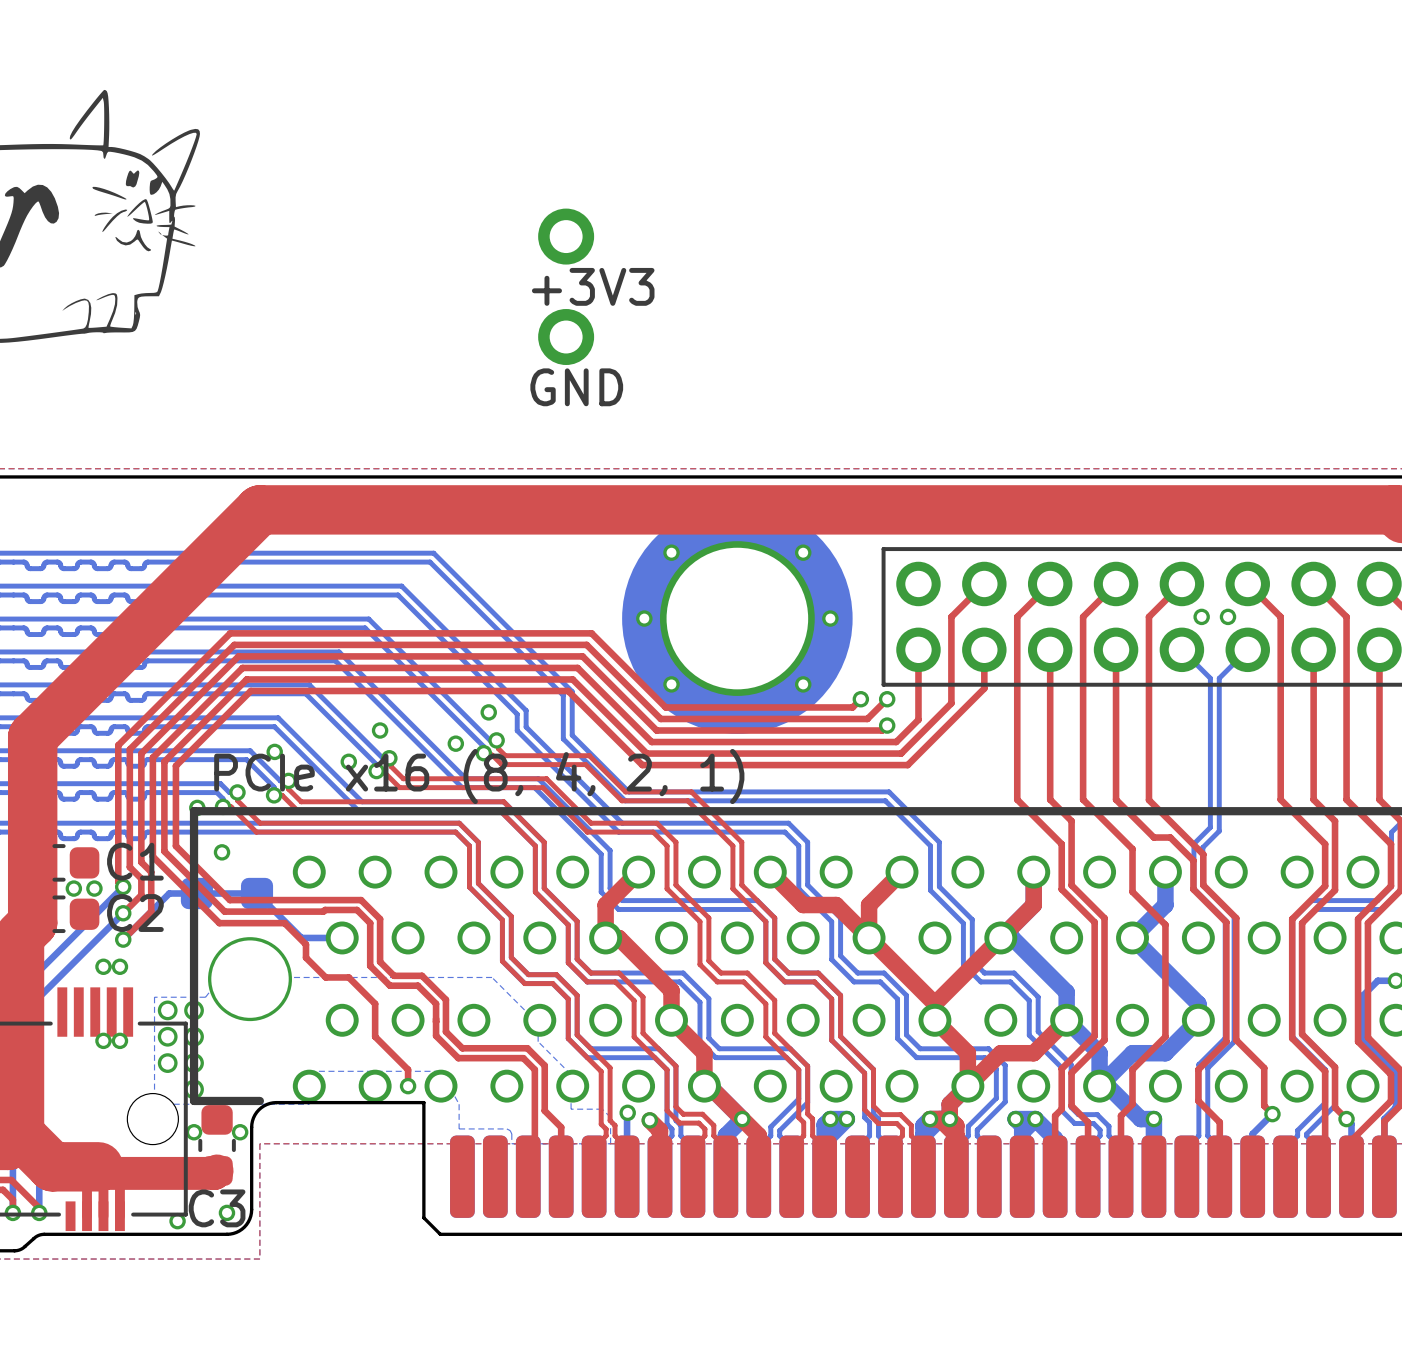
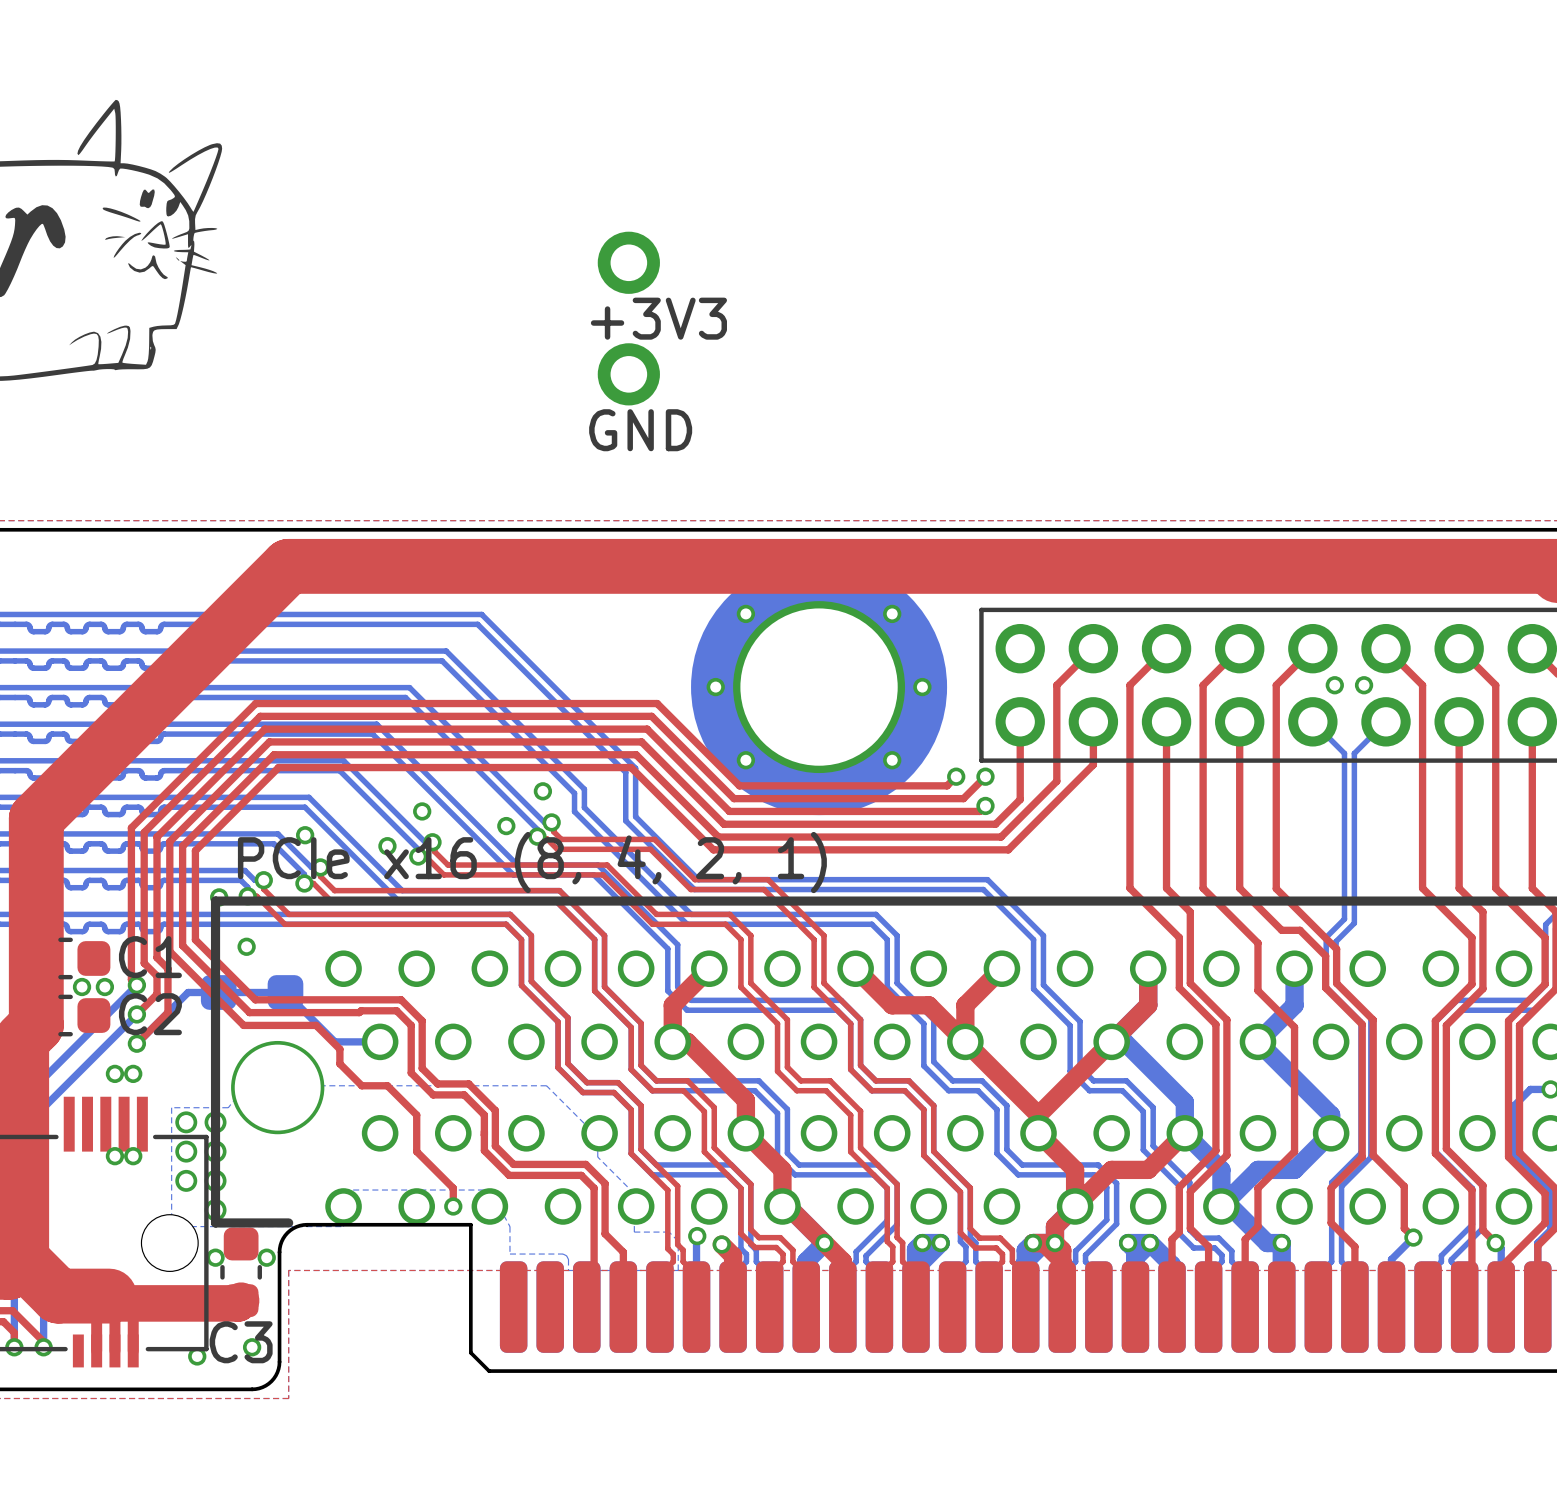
board edge: (251, 1209) (246, 1224) (239, 1231) (230, 1234) (42, 1234) (35, 1237) (21, 1249) (14, 1250) -> (279, 1343) (279, 1365) (275, 1375) (265, 1385) (255, 1389) (16, 1389)

